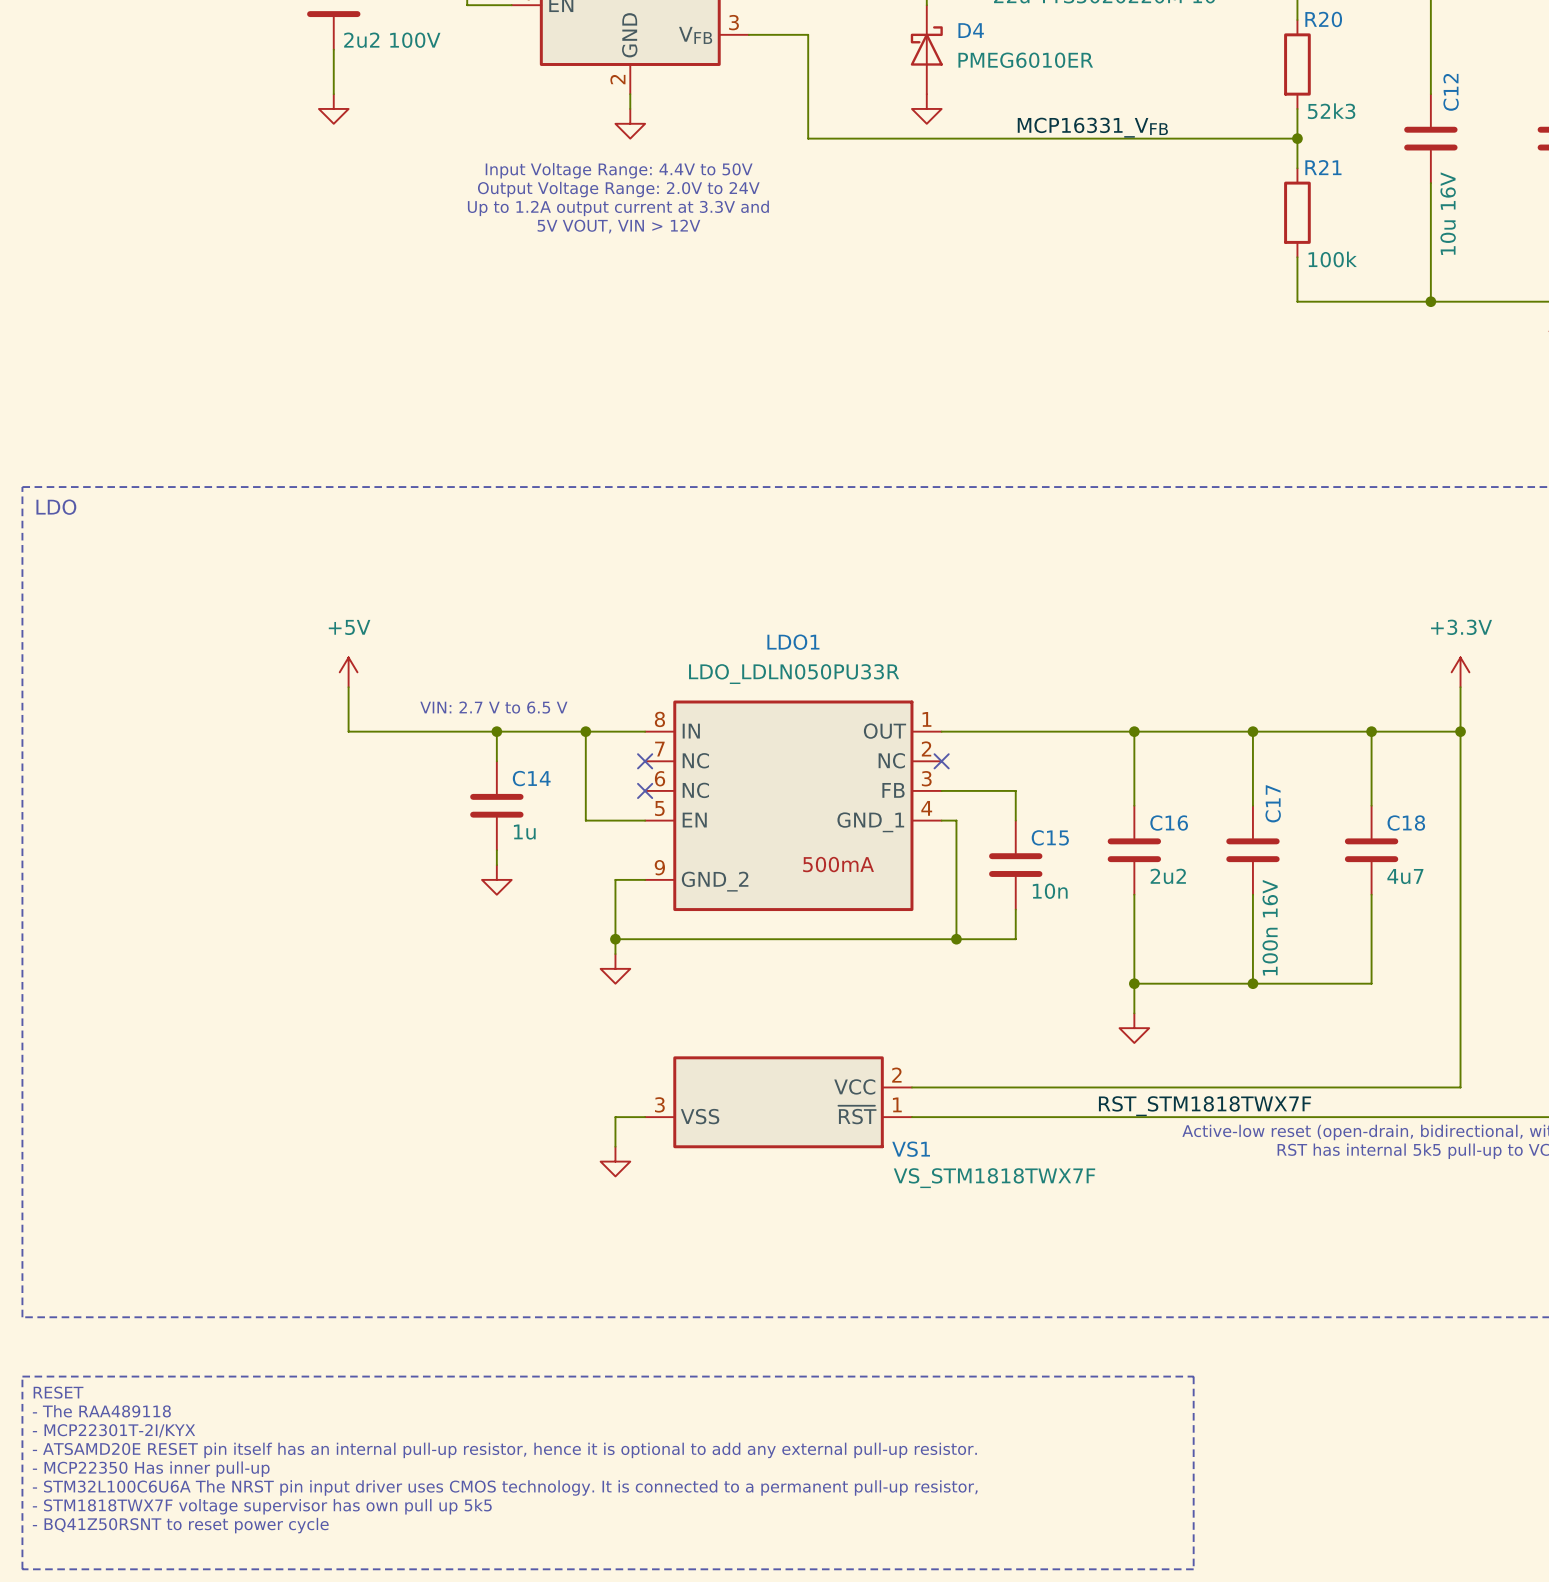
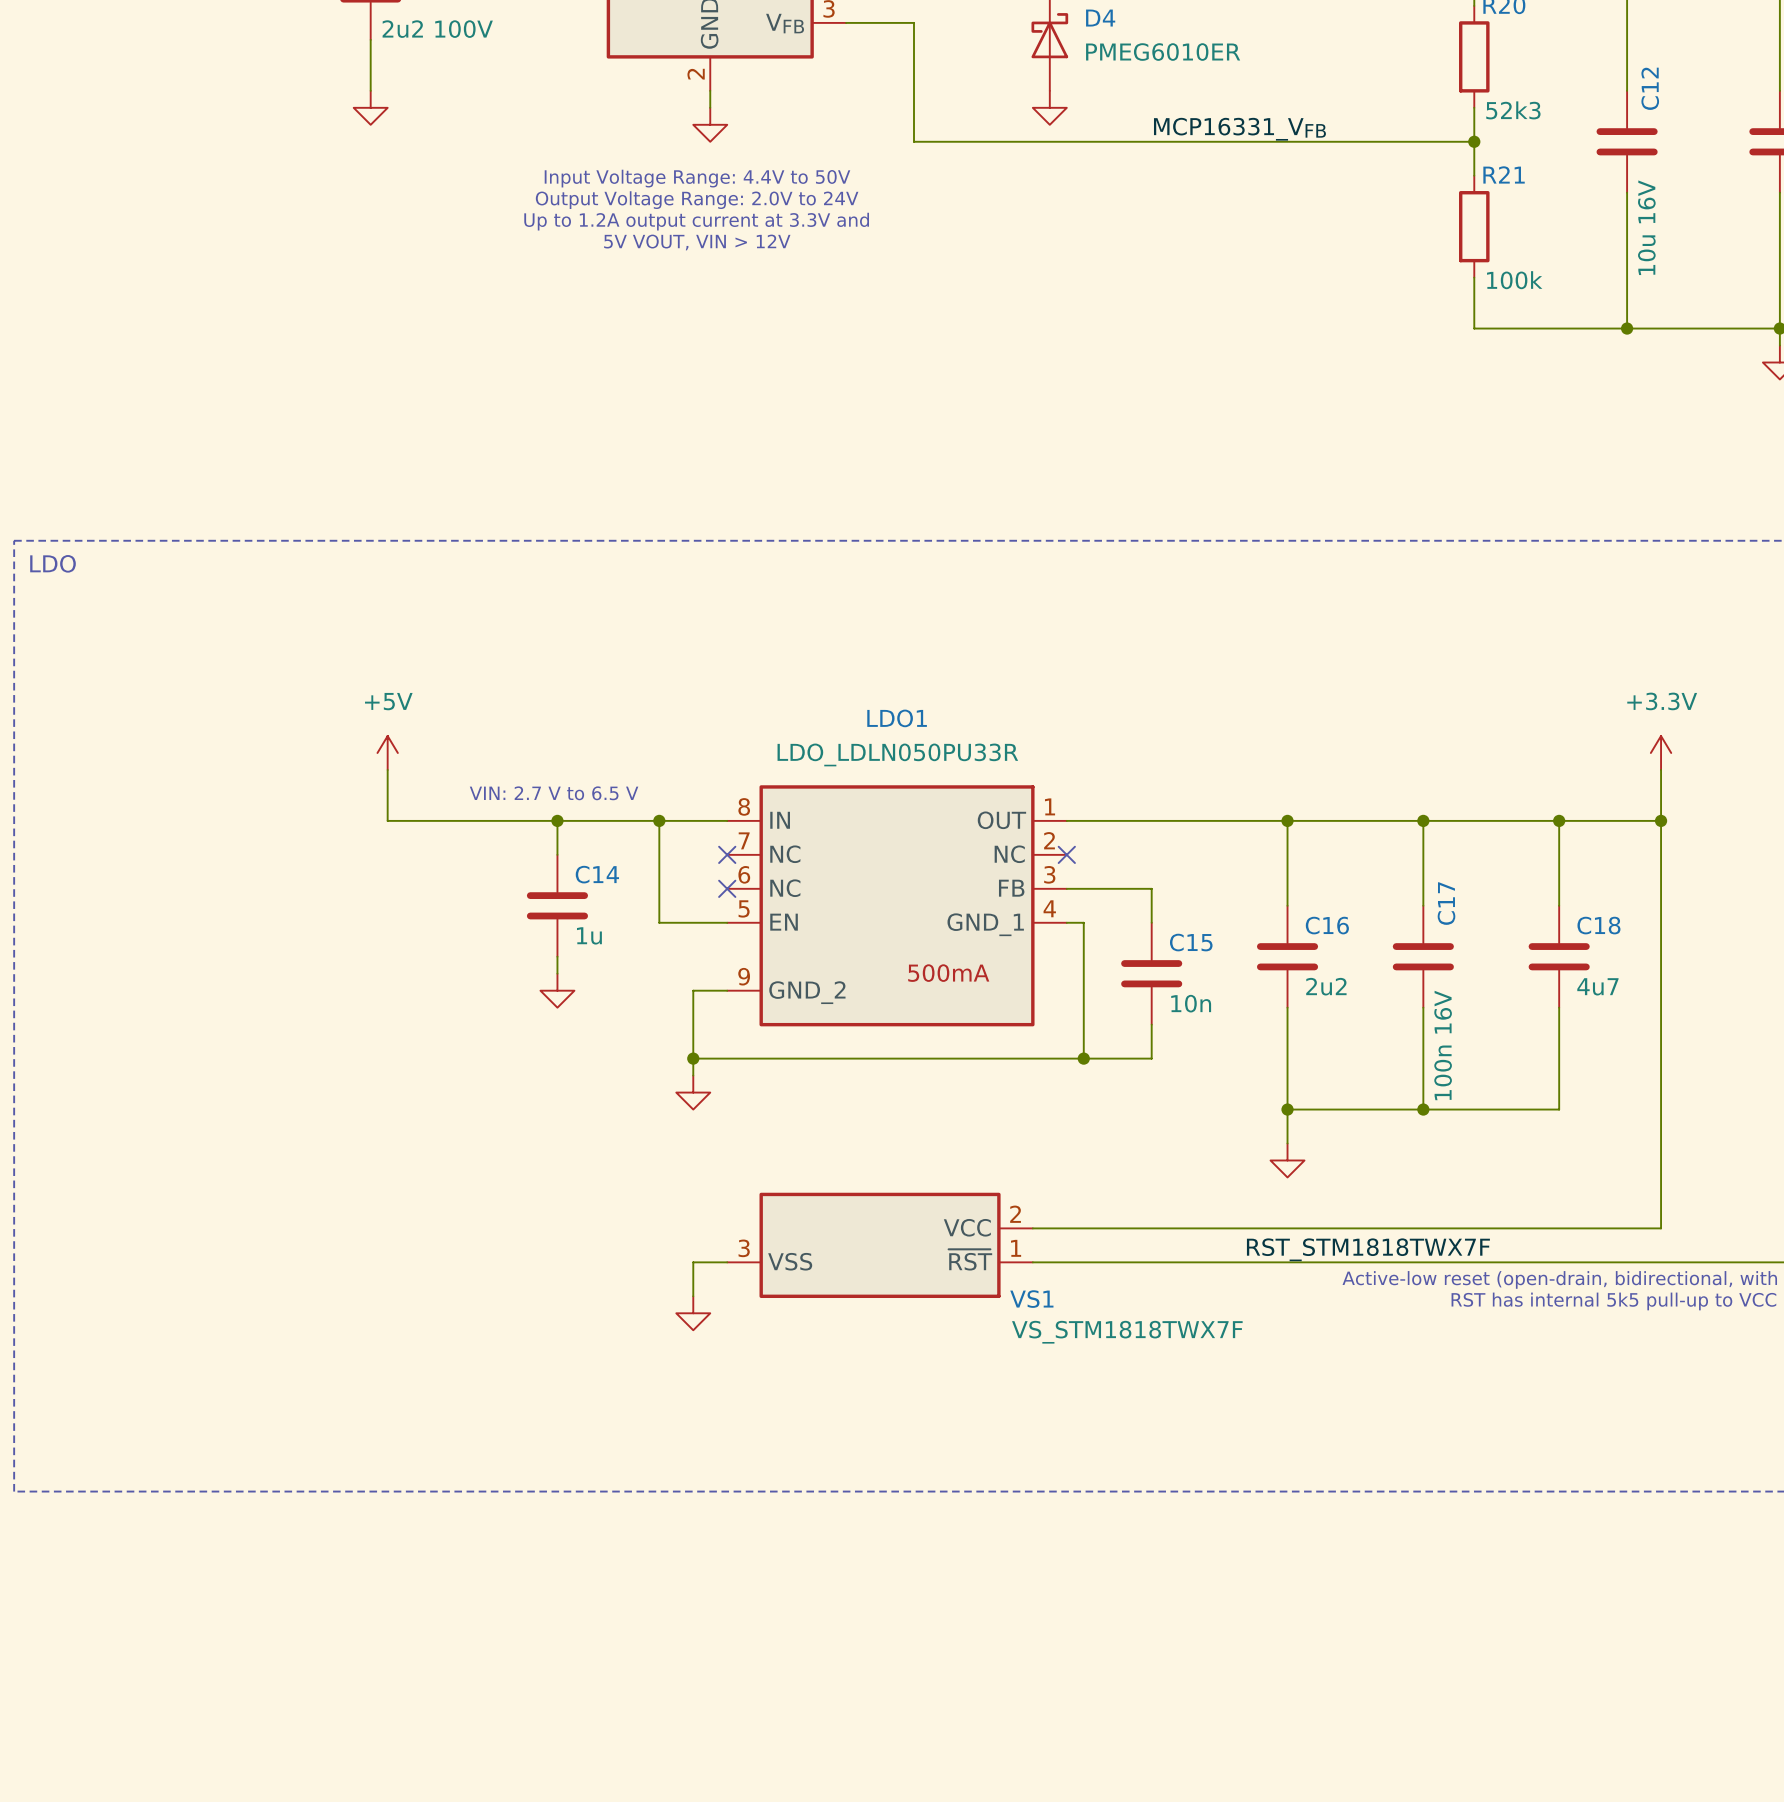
line: (22, 1376) (1193, 1376) (1193, 1569) (22, 1569) (22, 1376) -> none
text: RESET (58, 1392) -> none
text: - The RAA489118 (101, 1411) -> none
text: - MCP22301T-2I/KYX (114, 1430) -> none
text: - ATSAMD20E RESET pin itself has an internal pull-up resistor, hence it is optional to add any external pull-up resistor. (504, 1450) -> none
text: - MCP22350 Has inner pull-up (151, 1469) -> none
text: - STM32L100C6U6A The NRST pin input driver uses CMOS technology. It is connected to a permanent pull-up resistor, (505, 1488) -> none
text: - STM1818TWX7F voltage supervisor has own pull up 5k5 (262, 1506) -> none
text: - BQ41Z50RSNT to reset power cycle (180, 1525) -> none

